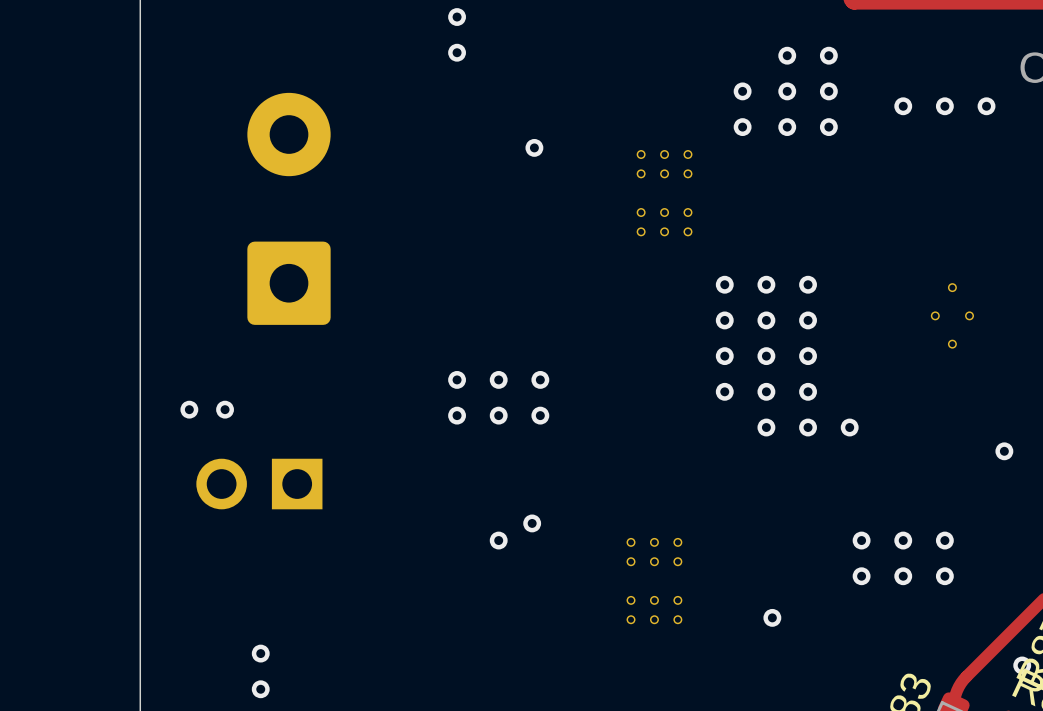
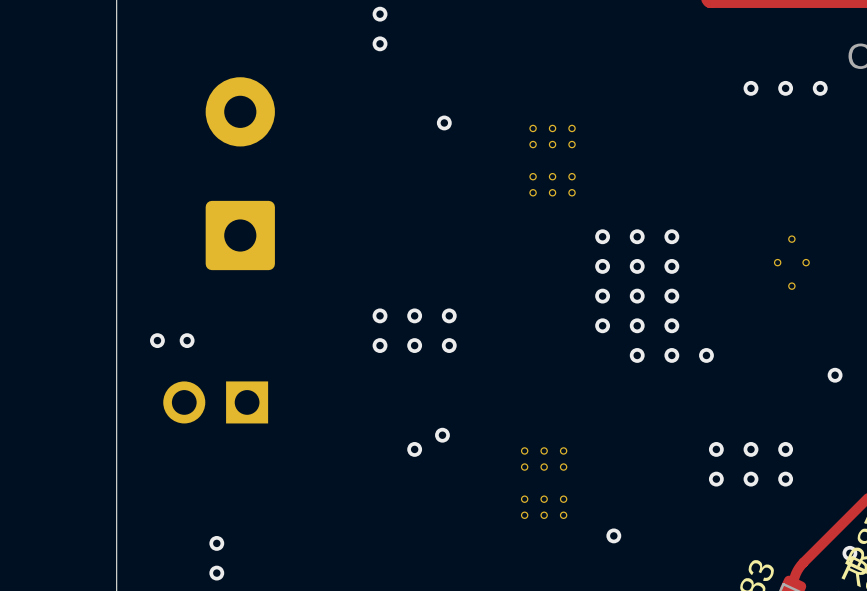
via: (787, 55) -> none
via: (828, 55) -> none
via: (742, 91) -> none
via: (787, 91) -> none
via: (828, 91) -> none
via: (742, 127) -> none
via: (787, 127) -> none
via: (828, 127) -> none
via position: (772, 617) -> (613, 535)

